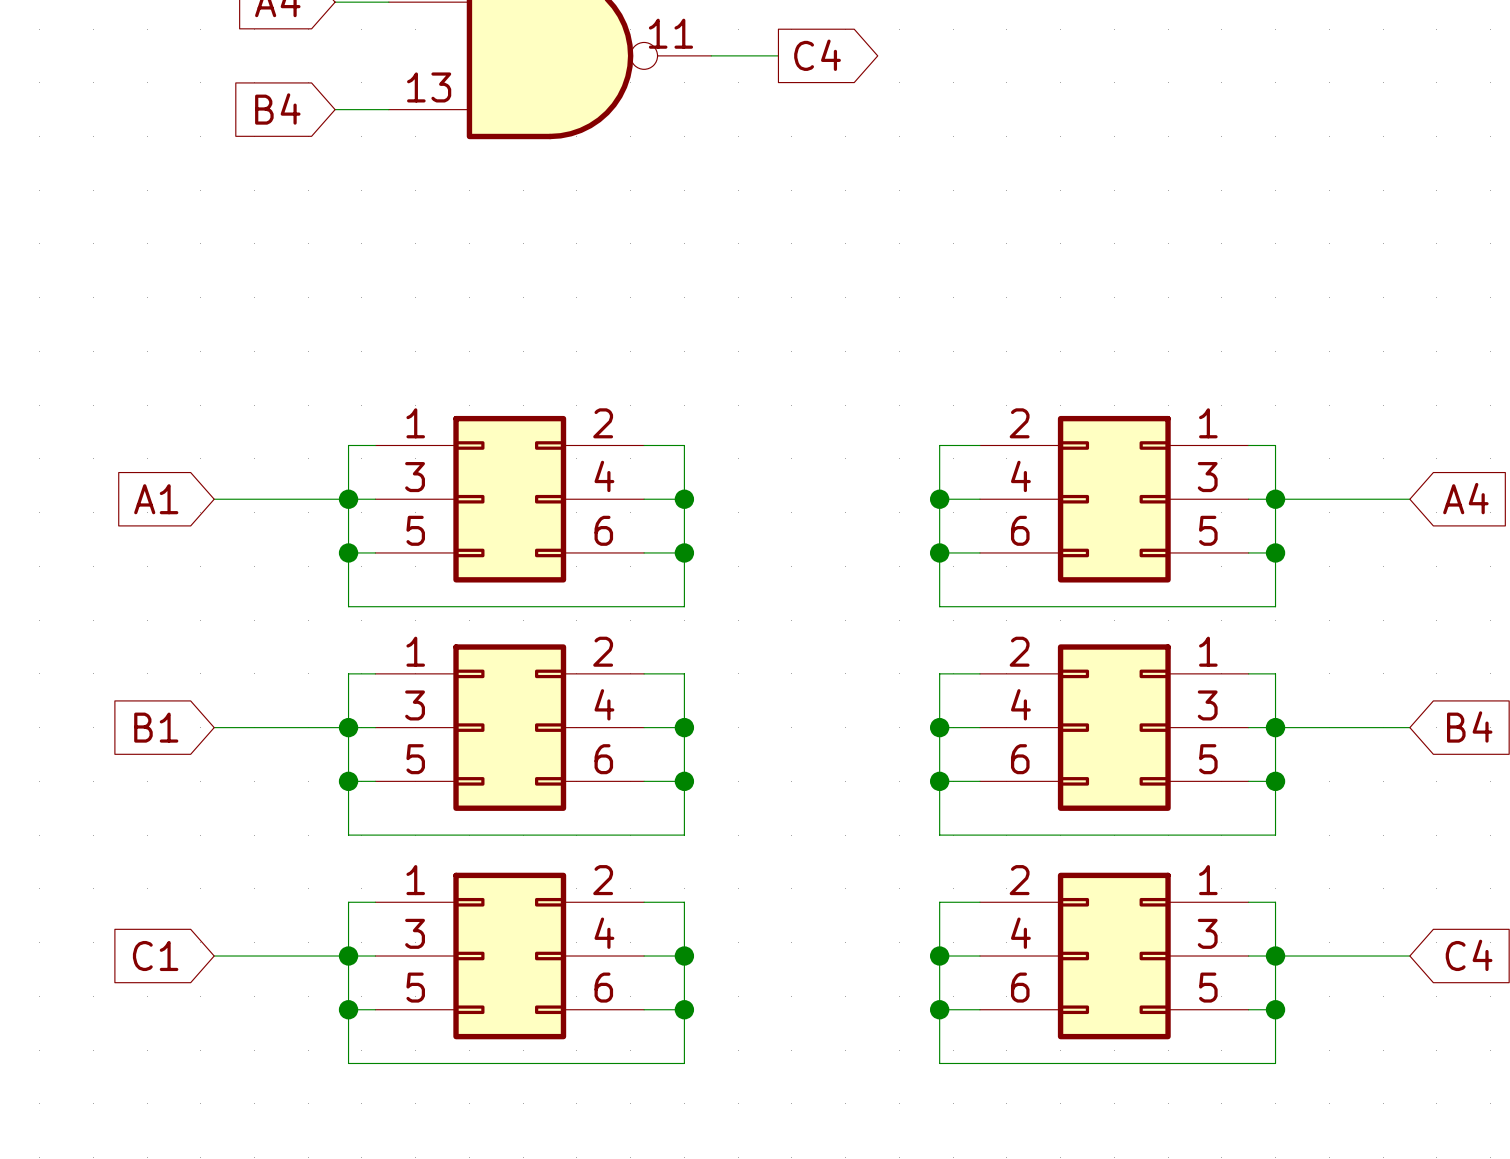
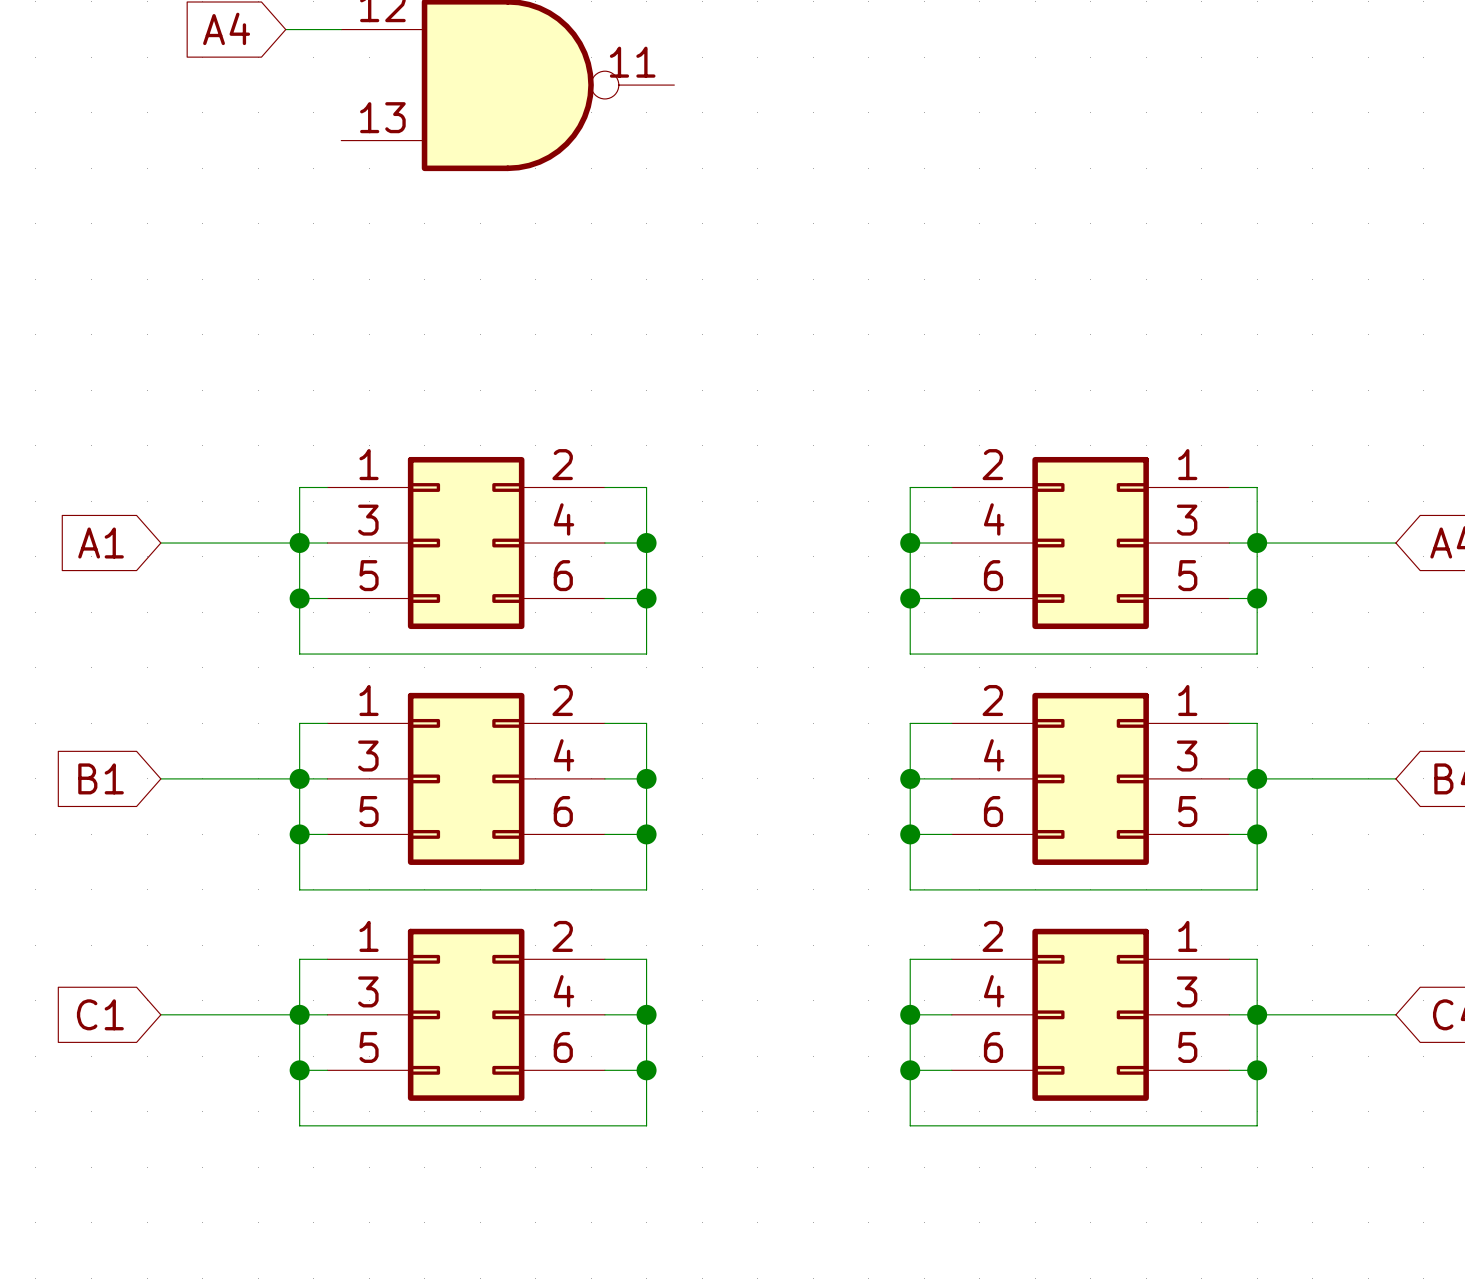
wire: (711, 55) (778, 55) -> none
global label: C4 (817, 55) -> none
global label: B4 (277, 108) -> none
wire: (335, 109) (388, 109) -> none

